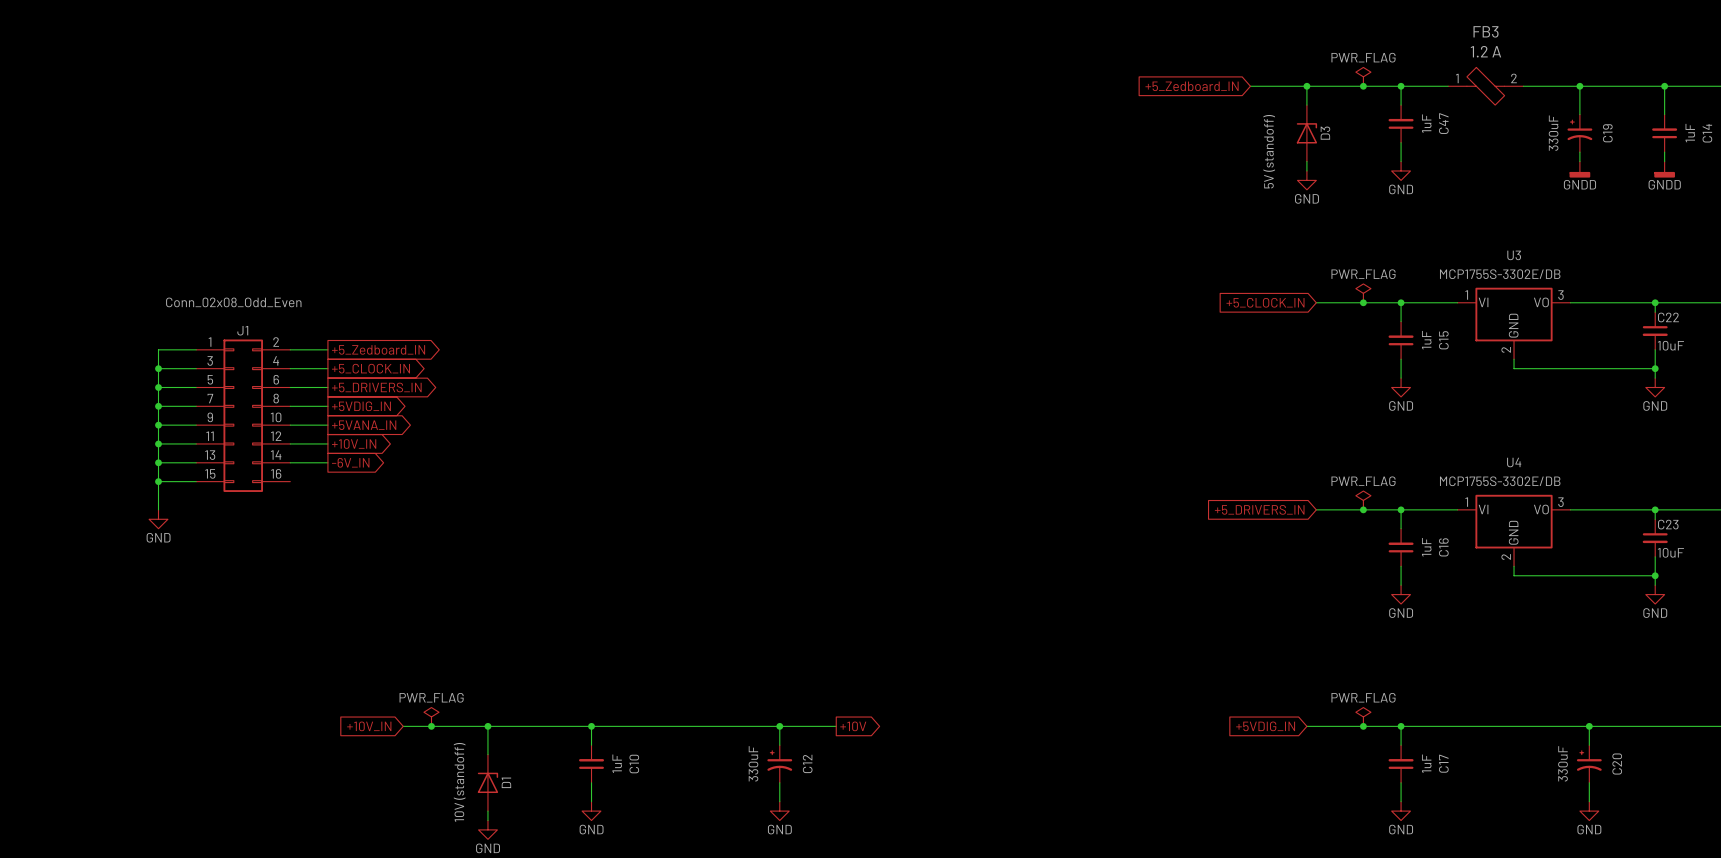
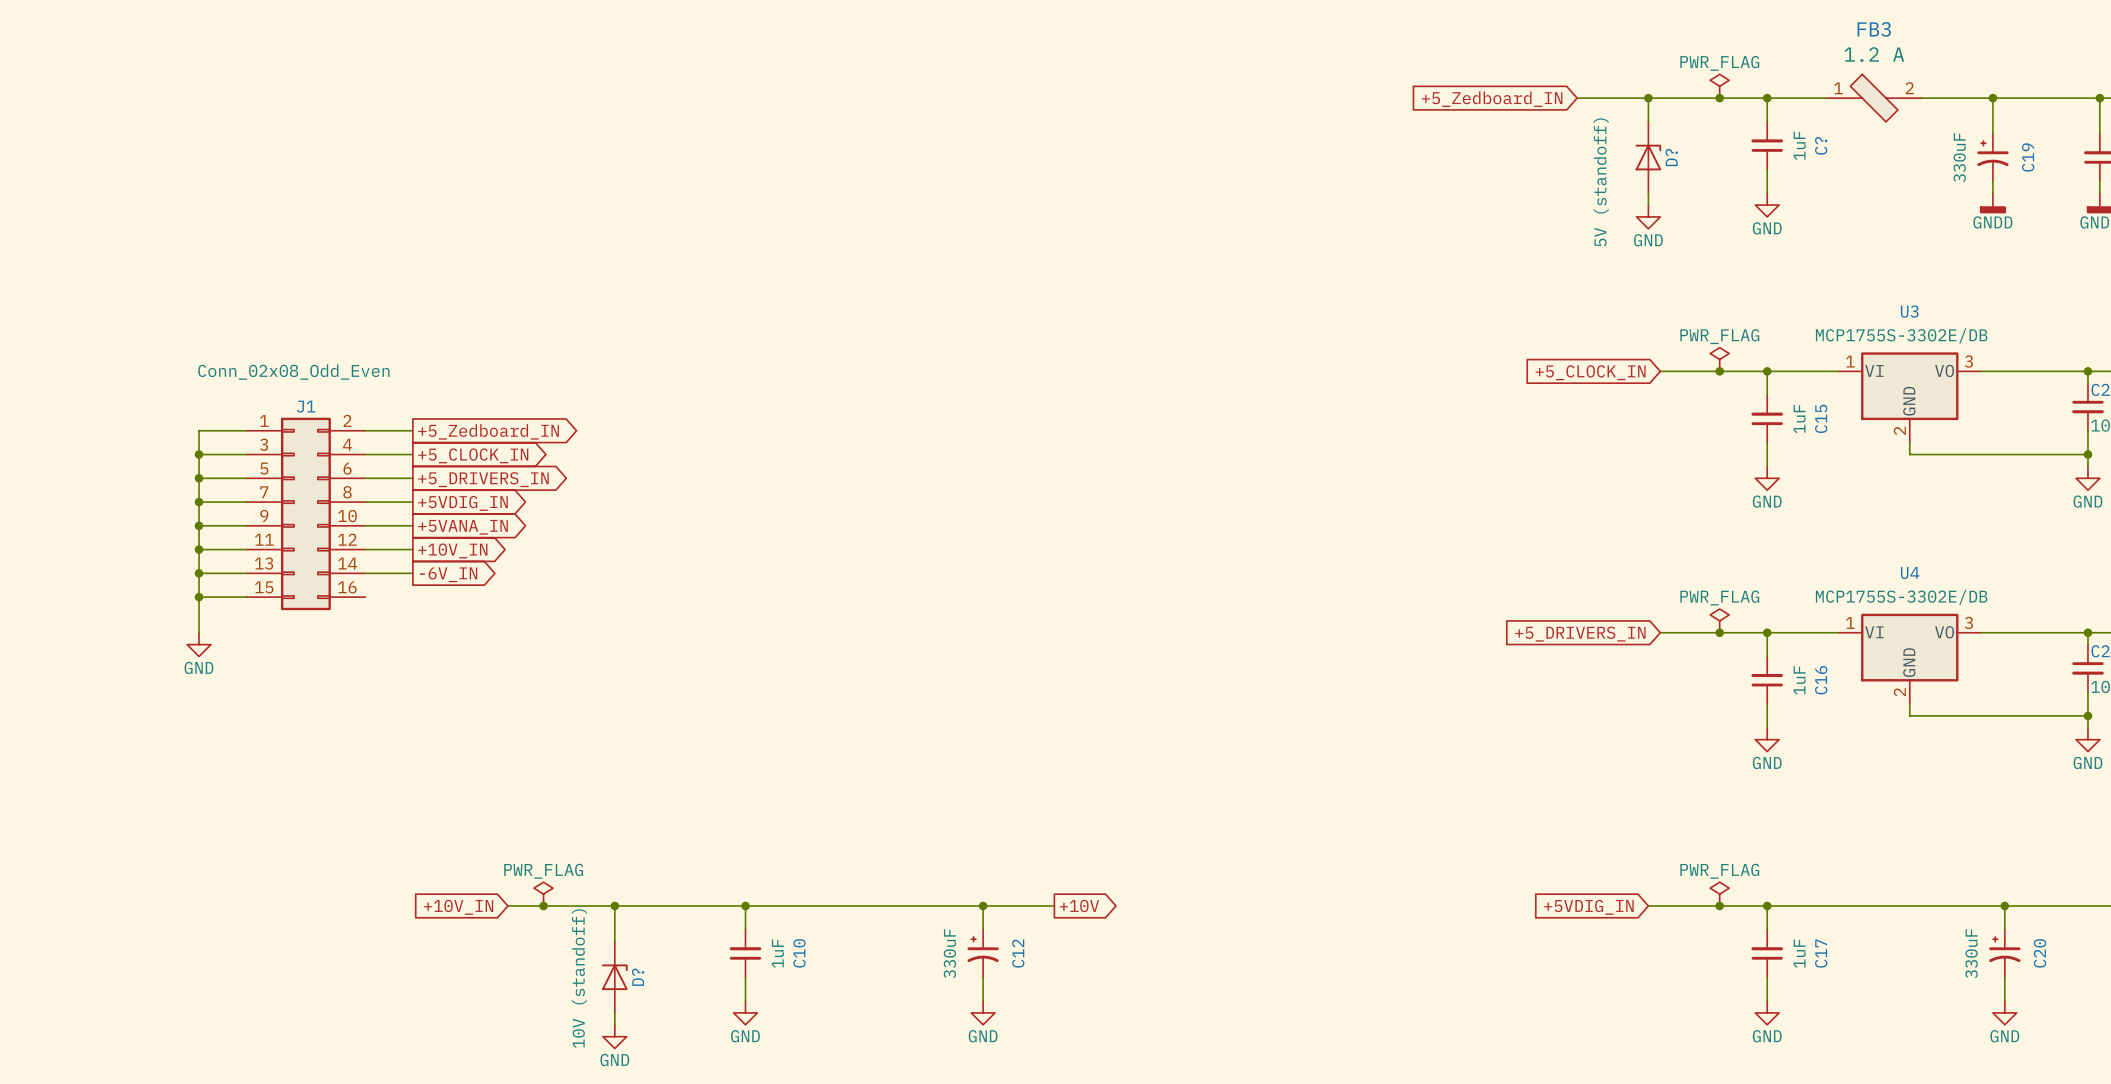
C47 name: C47 (1443, 123) -> C? (1821, 145)
D3 name: D3 (1325, 133) -> D? (1671, 157)
D1 name: D1 (506, 782) -> D? (638, 977)

